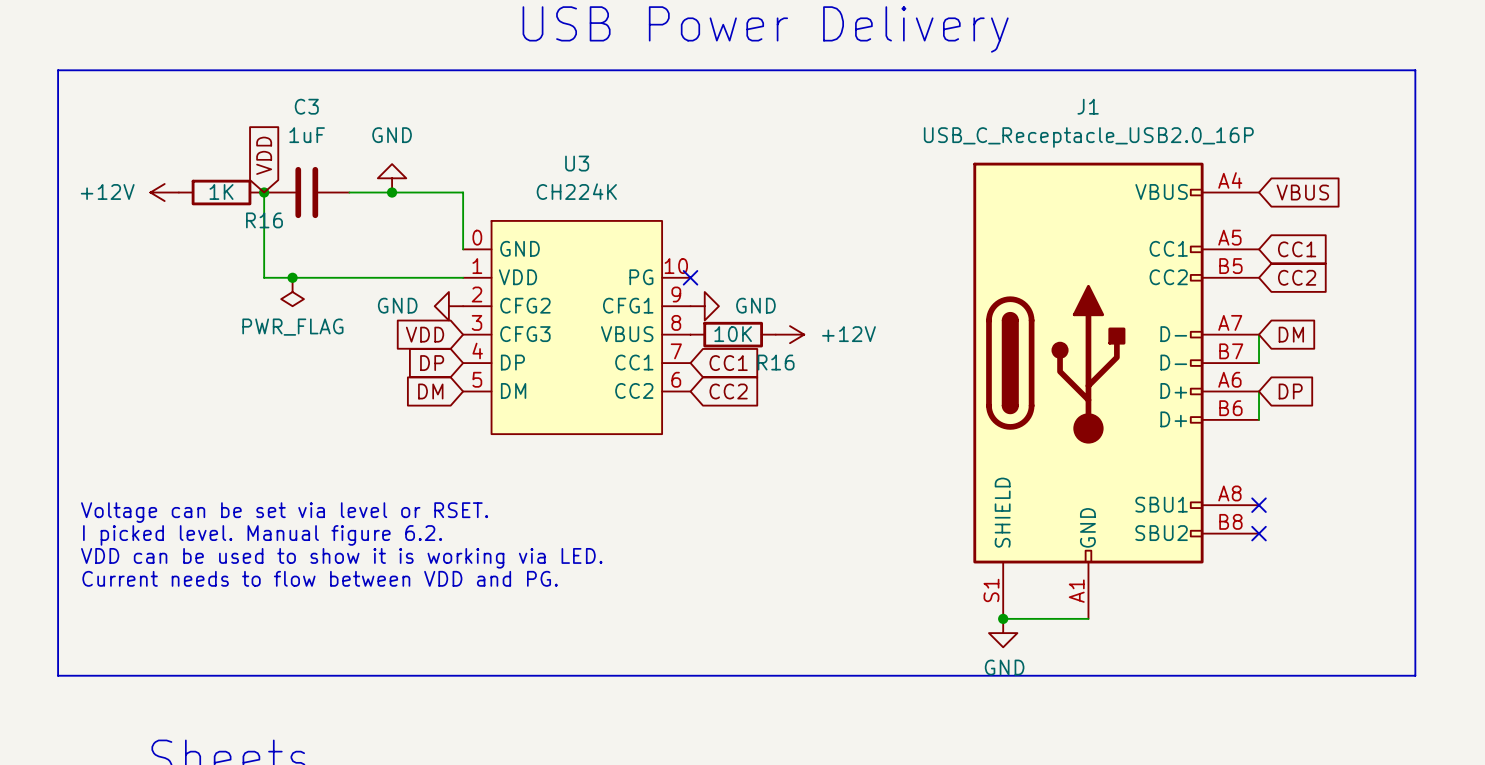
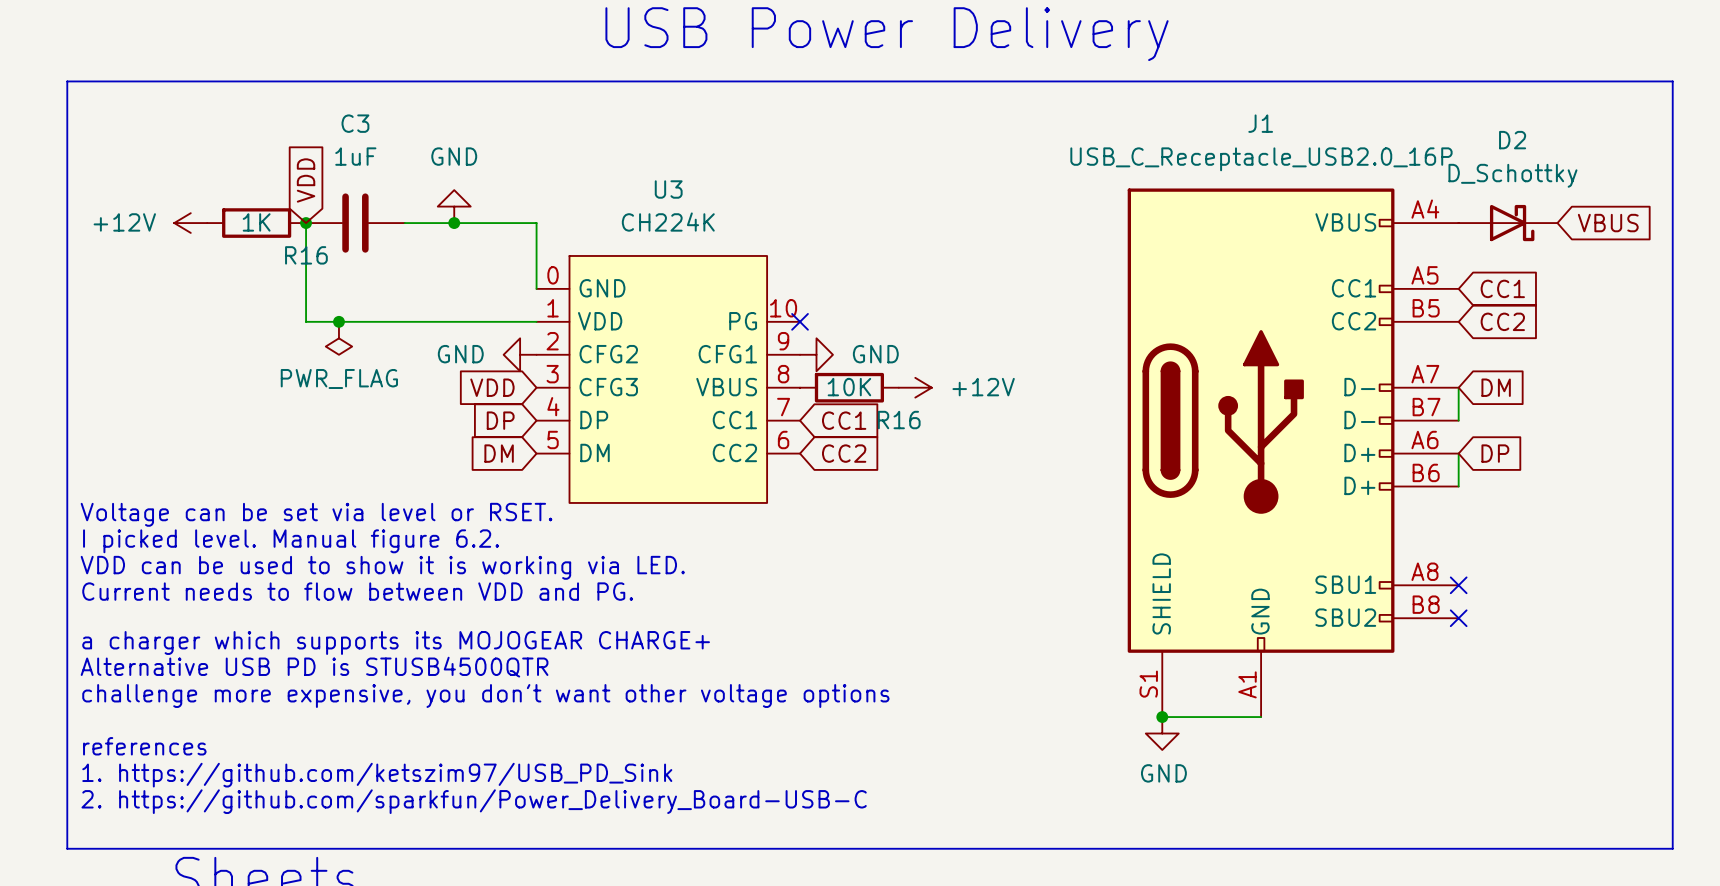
line: (1415, 70) (1415, 675) (58, 675) -> (1639, 81) (1672, 81) (1672, 848) (67, 848) (67, 782)
D2: none -> D_Schottky (1508, 223)
global label position: VBUS (1302, 192) -> VBUS (1608, 223)
text position: Voltage can be set via level or RSET. (284, 512) -> Voltage can be set via level or RSET. (316, 514)
text position: I picked level. Manual figure 6.2. (262, 535) -> I picked level. Manual figure 6.2. (291, 541)
text: none -> a charger which supports its MOJOGEAR CHARGE+ (396, 642)
text position: VDD can be used to show it is working via LED. (341, 558) -> VDD can be used to show it is working via LED. (382, 567)
text: none -> Alternative USB PD is STUSB4500QTR (314, 667)
text position: Current needs to flow between VDD and PG. (320, 578) -> Current needs to flow between VDD and PG. (357, 591)
text: none -> challenge more expensive, you don't want other voltage options (485, 696)
text: none -> references (144, 746)
text: none -> 1. https://github.com/ketszim97/USB_PD_Sink (377, 775)
text: none -> 2. https://github.com/sparkfun/Power_Delivery_Board-USB-C (474, 801)

